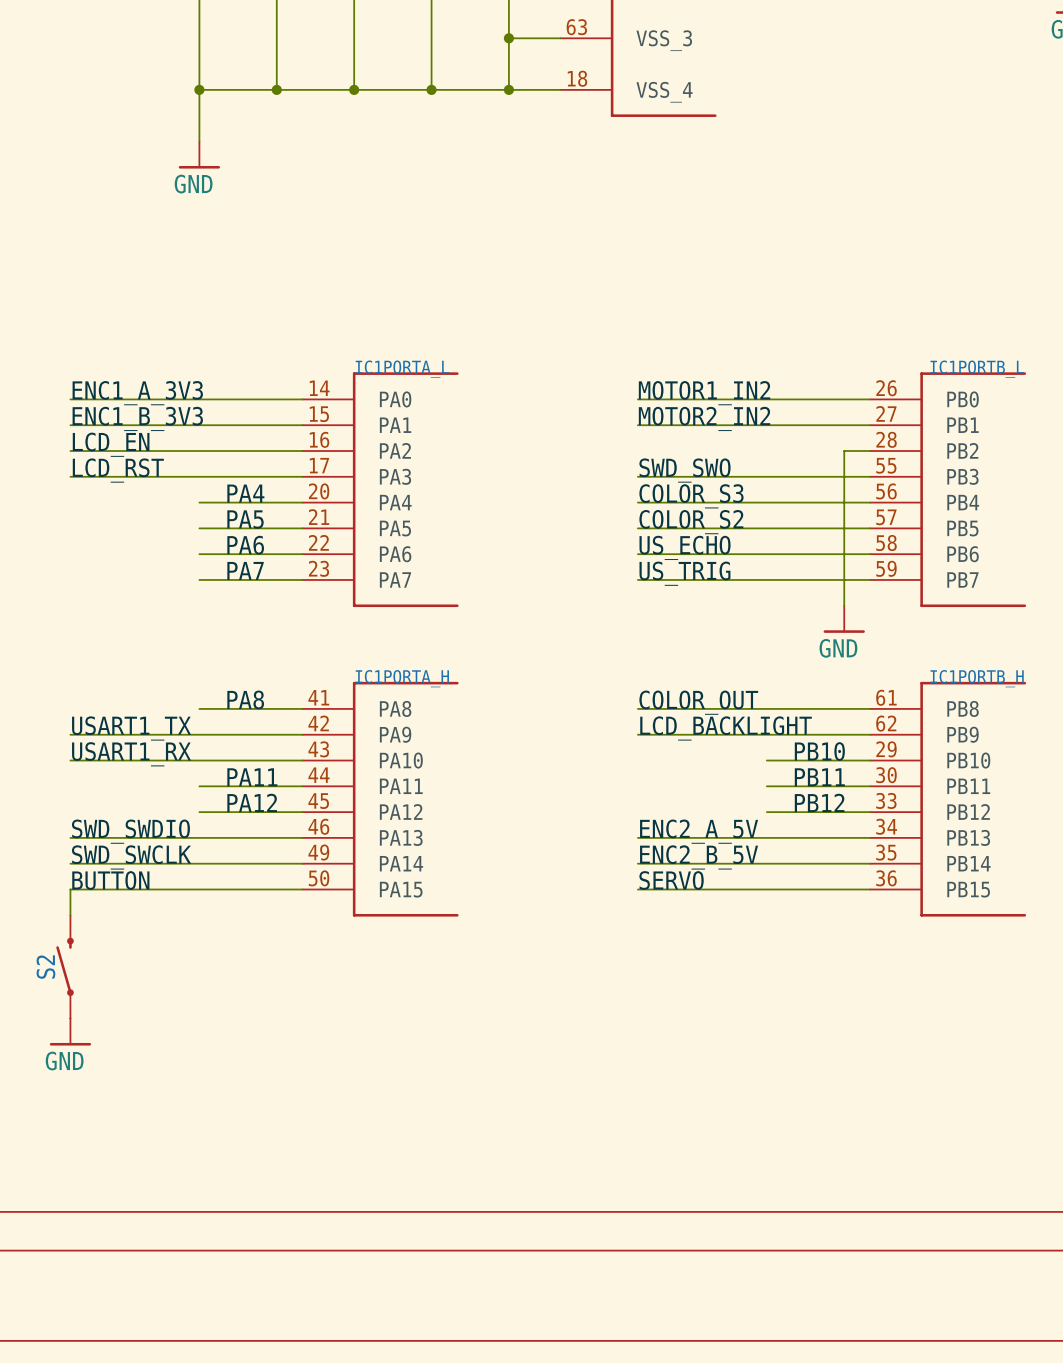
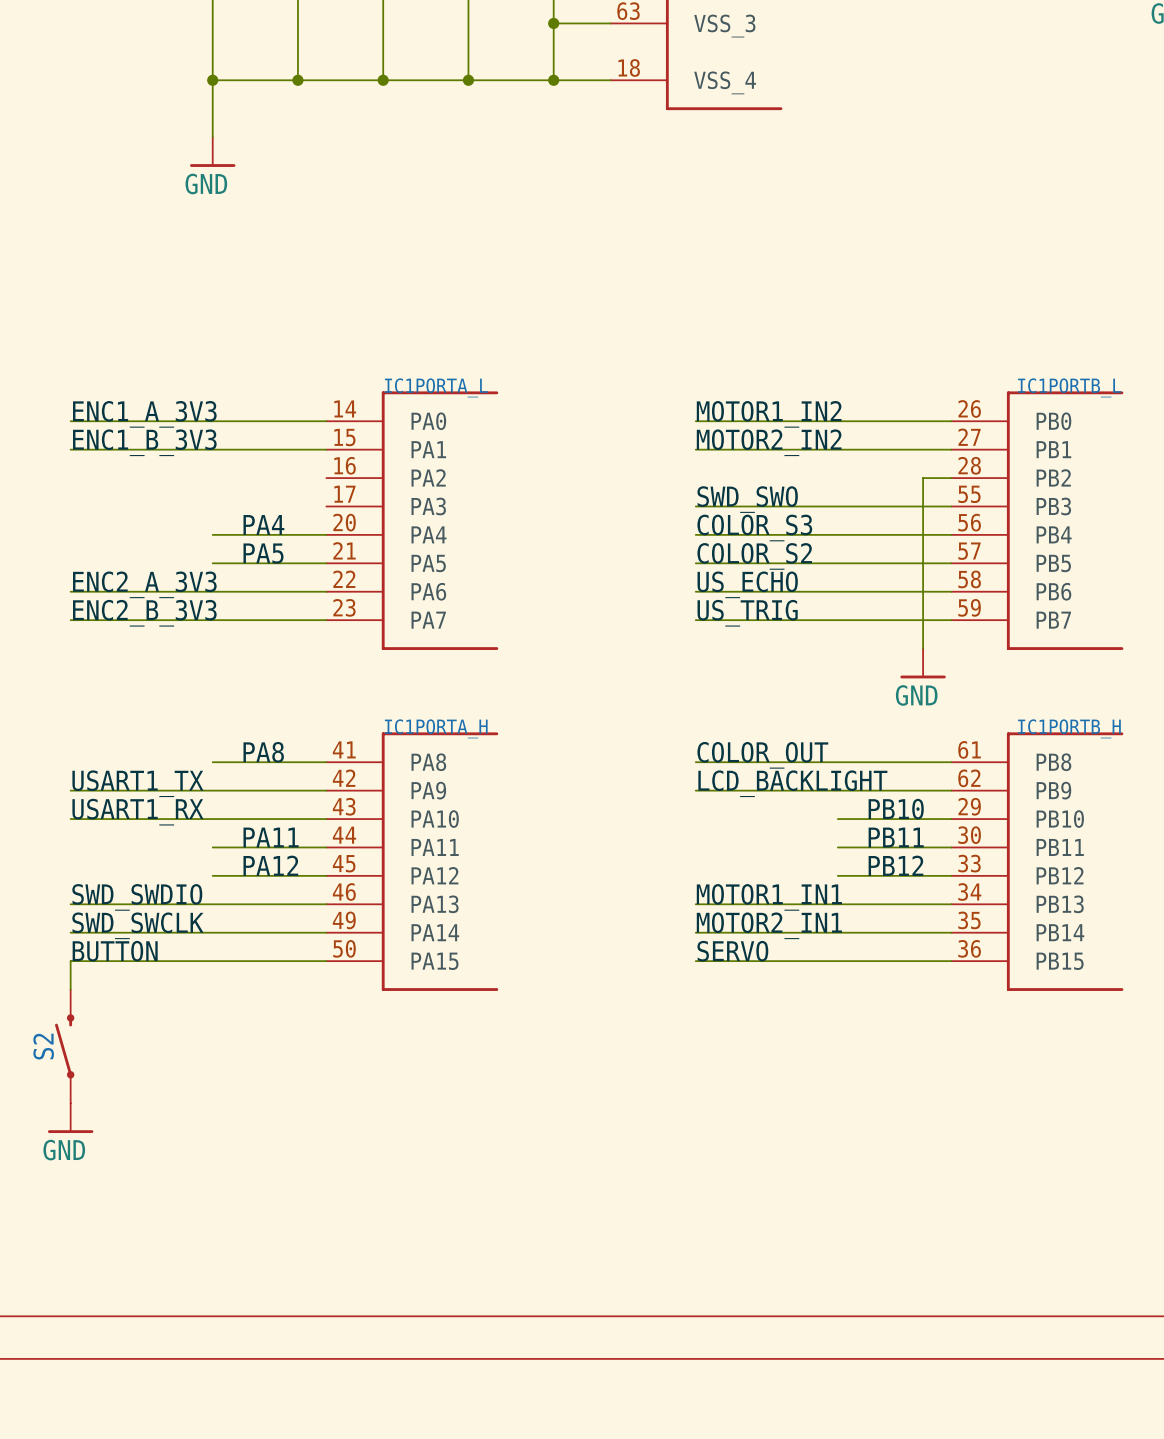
label: LCD_EN (111, 444) -> none
wire: (70, 451) (302, 451) -> none
label: LCD_RST (118, 470) -> none
wire: (70, 476) (302, 476) -> none
label: PA6 (245, 545) -> none
label: none -> ENC2_A_3V3 (144, 584)
wire: none -> (70, 591) (212, 591)
label: PA7 (245, 570) -> none
label: none -> ENC2_B_3V3 (144, 613)
wire: none -> (70, 620) (212, 620)
label: ENC2_A_5V (699, 831) -> MOTOR1_IN1 (769, 897)
label: ENC2_B_5V (699, 857) -> MOTOR2_IN1 (769, 925)

